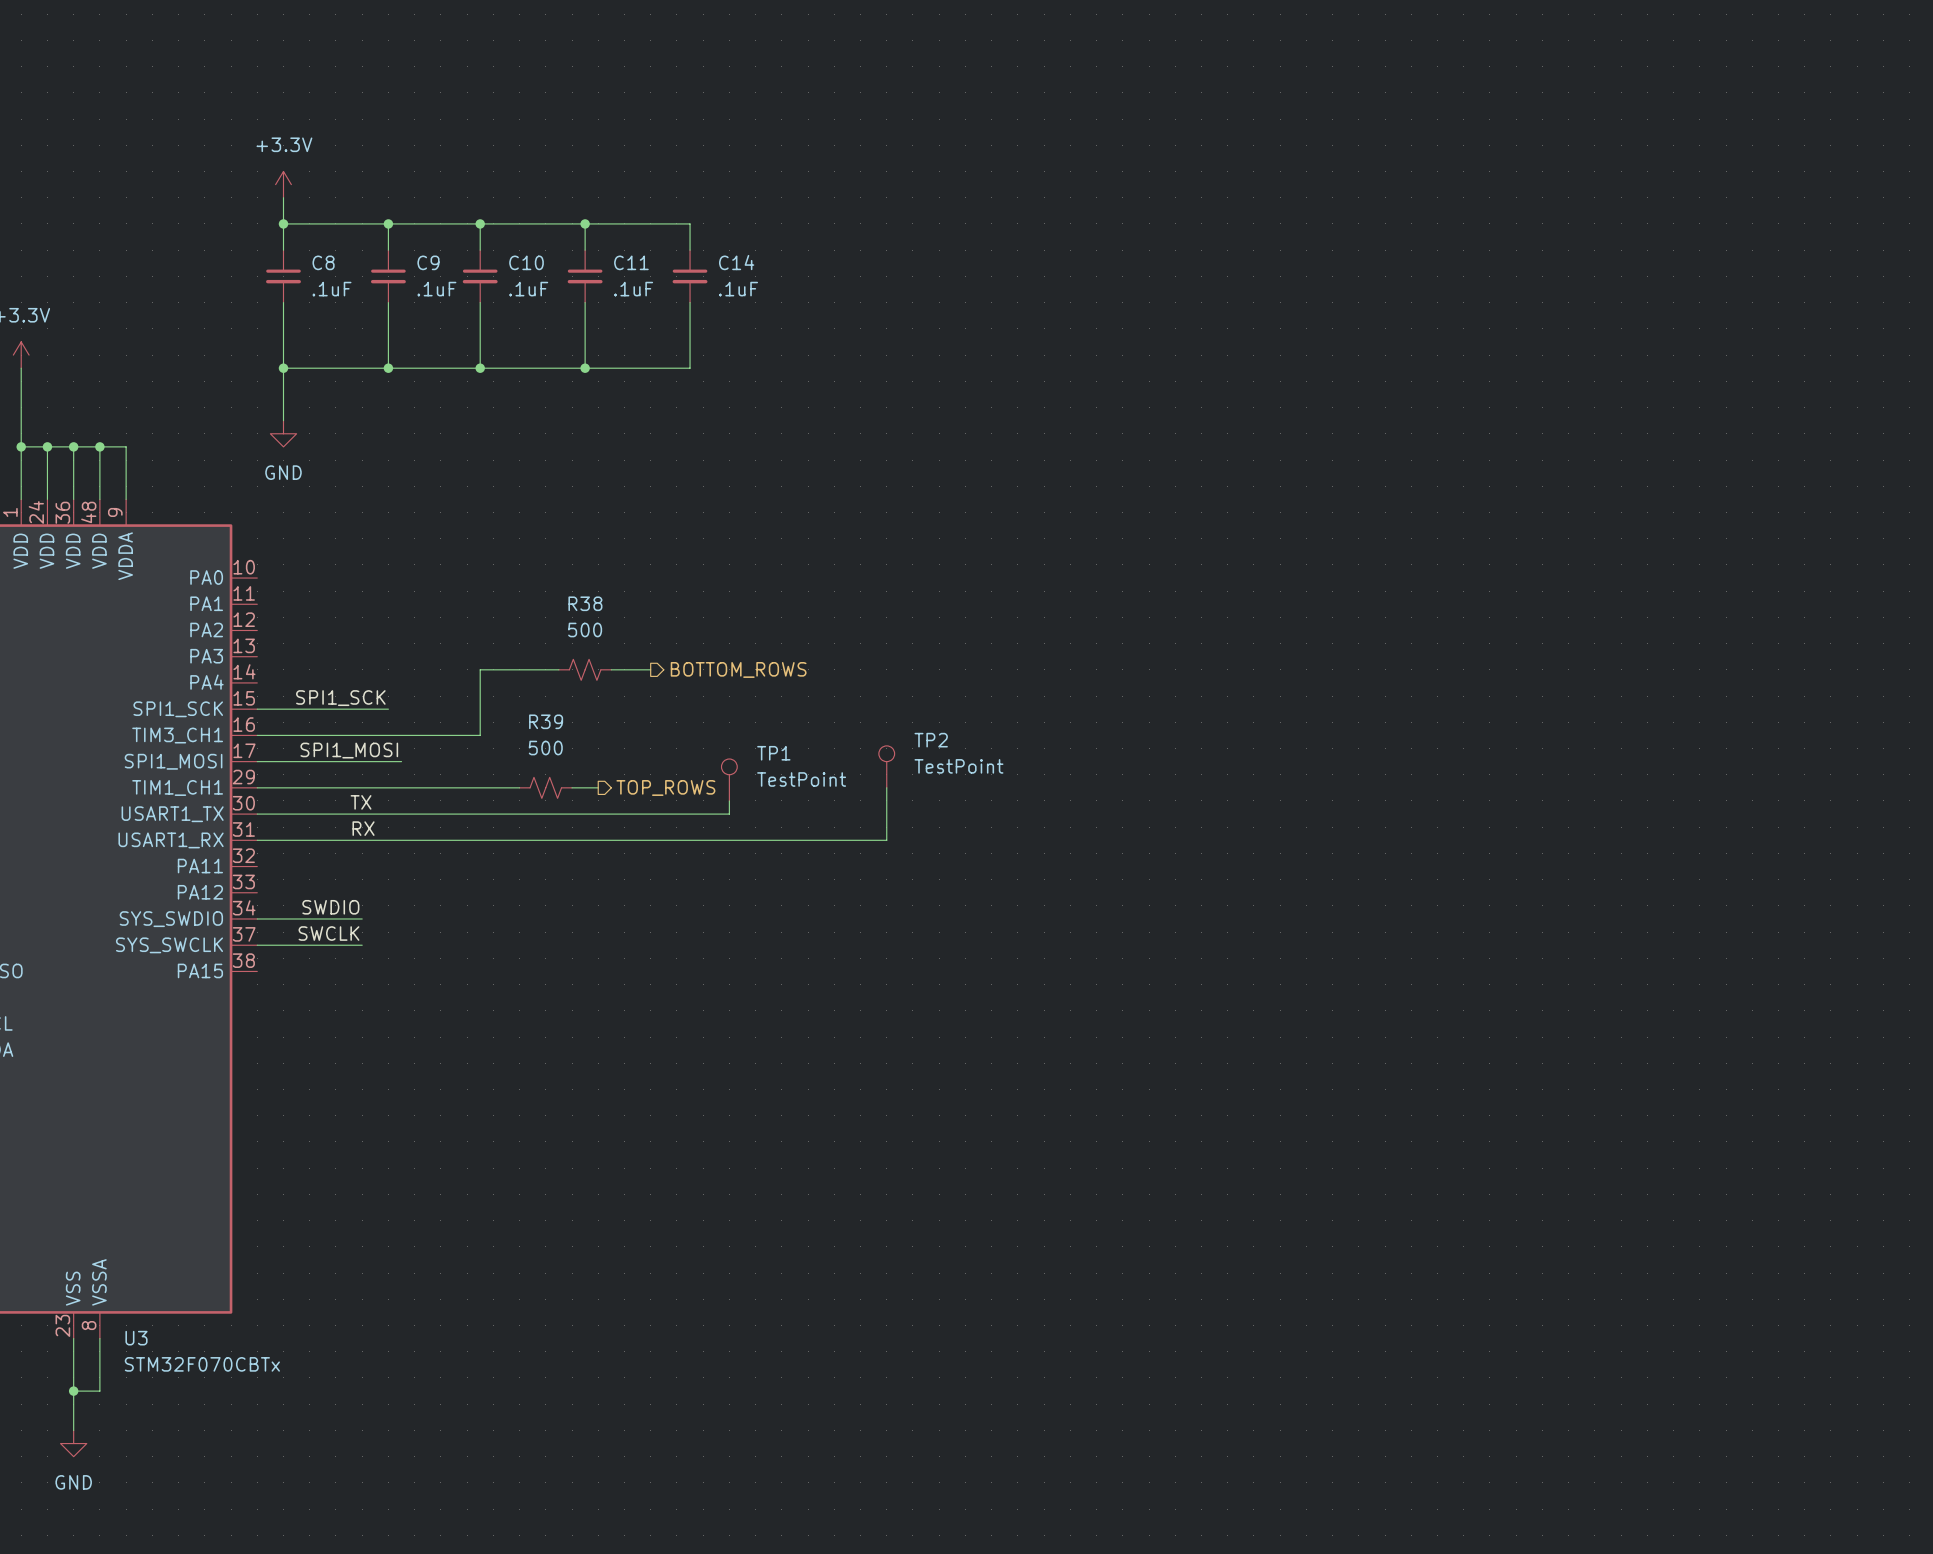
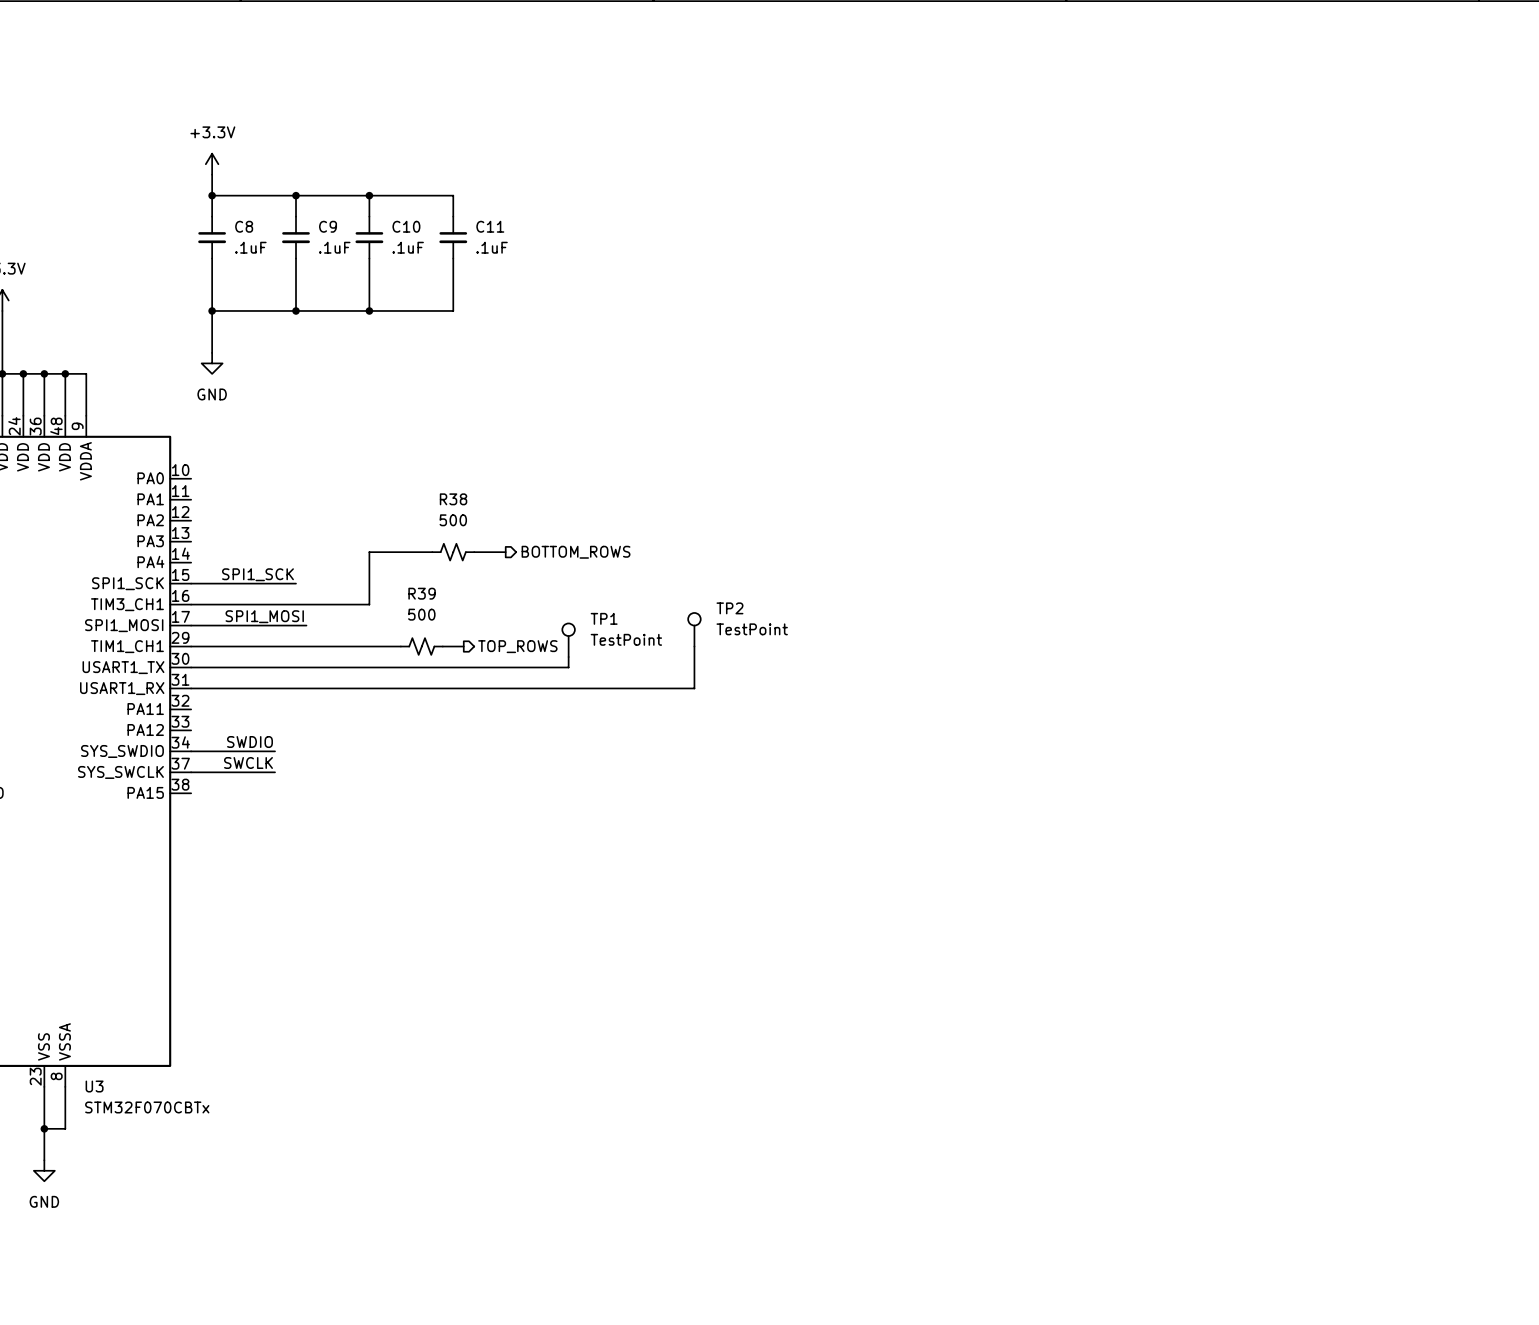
wire: (585, 223) (690, 223) (690, 250) -> none
junction: (585, 223) -> none
C14: .1uF (690, 276) -> none
wire: (690, 302) (690, 368) (585, 368) -> none
junction: (585, 368) -> none
label: TX (361, 802) -> none
label: RX (363, 828) -> none

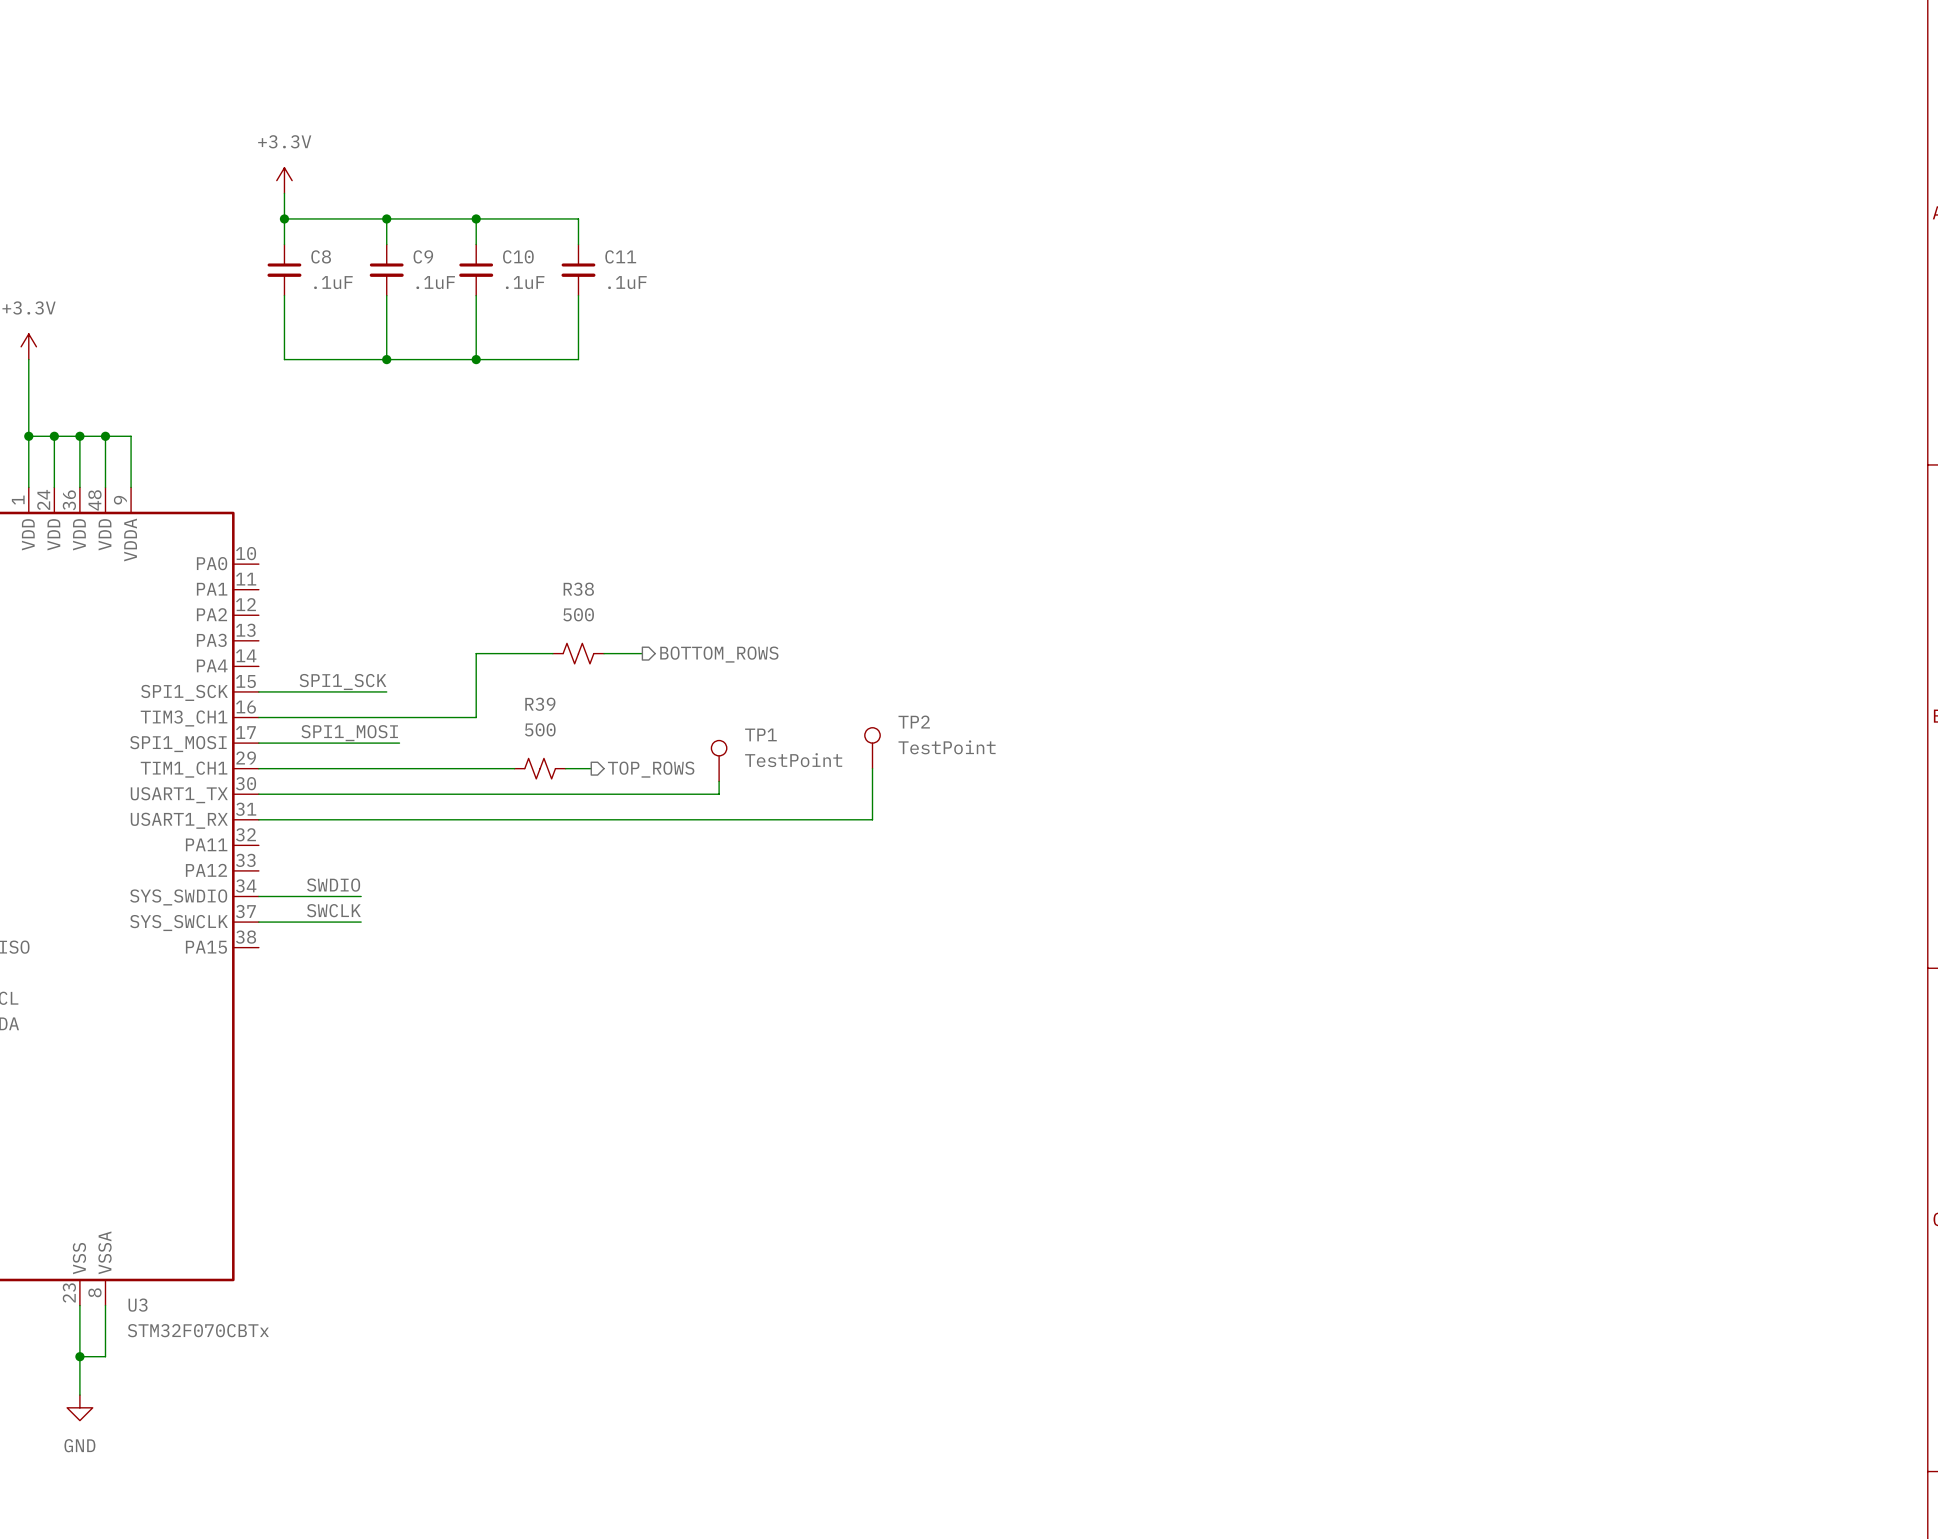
wire: (212, 310) (212, 352) -> none
junction: (212, 310) -> none
power symbol: GND (212, 363) -> none

